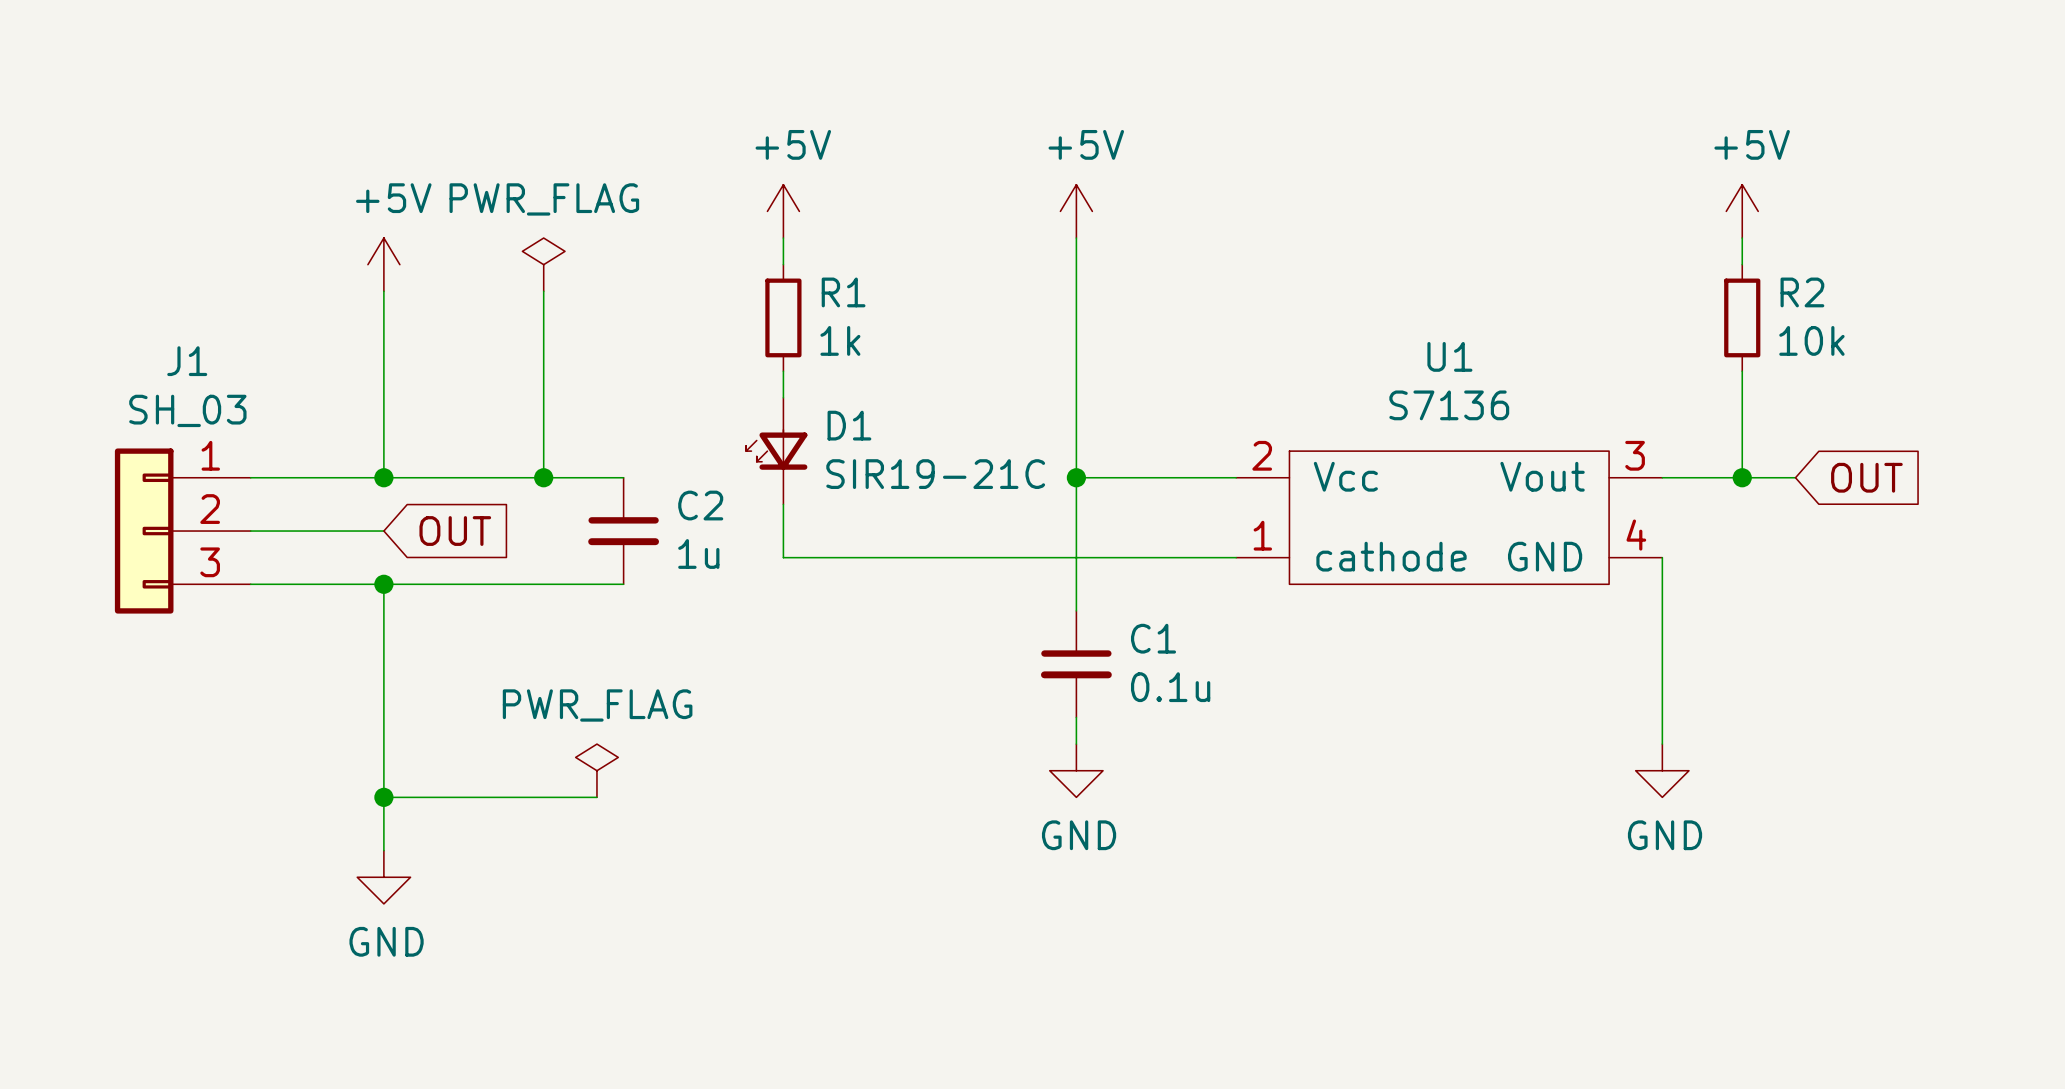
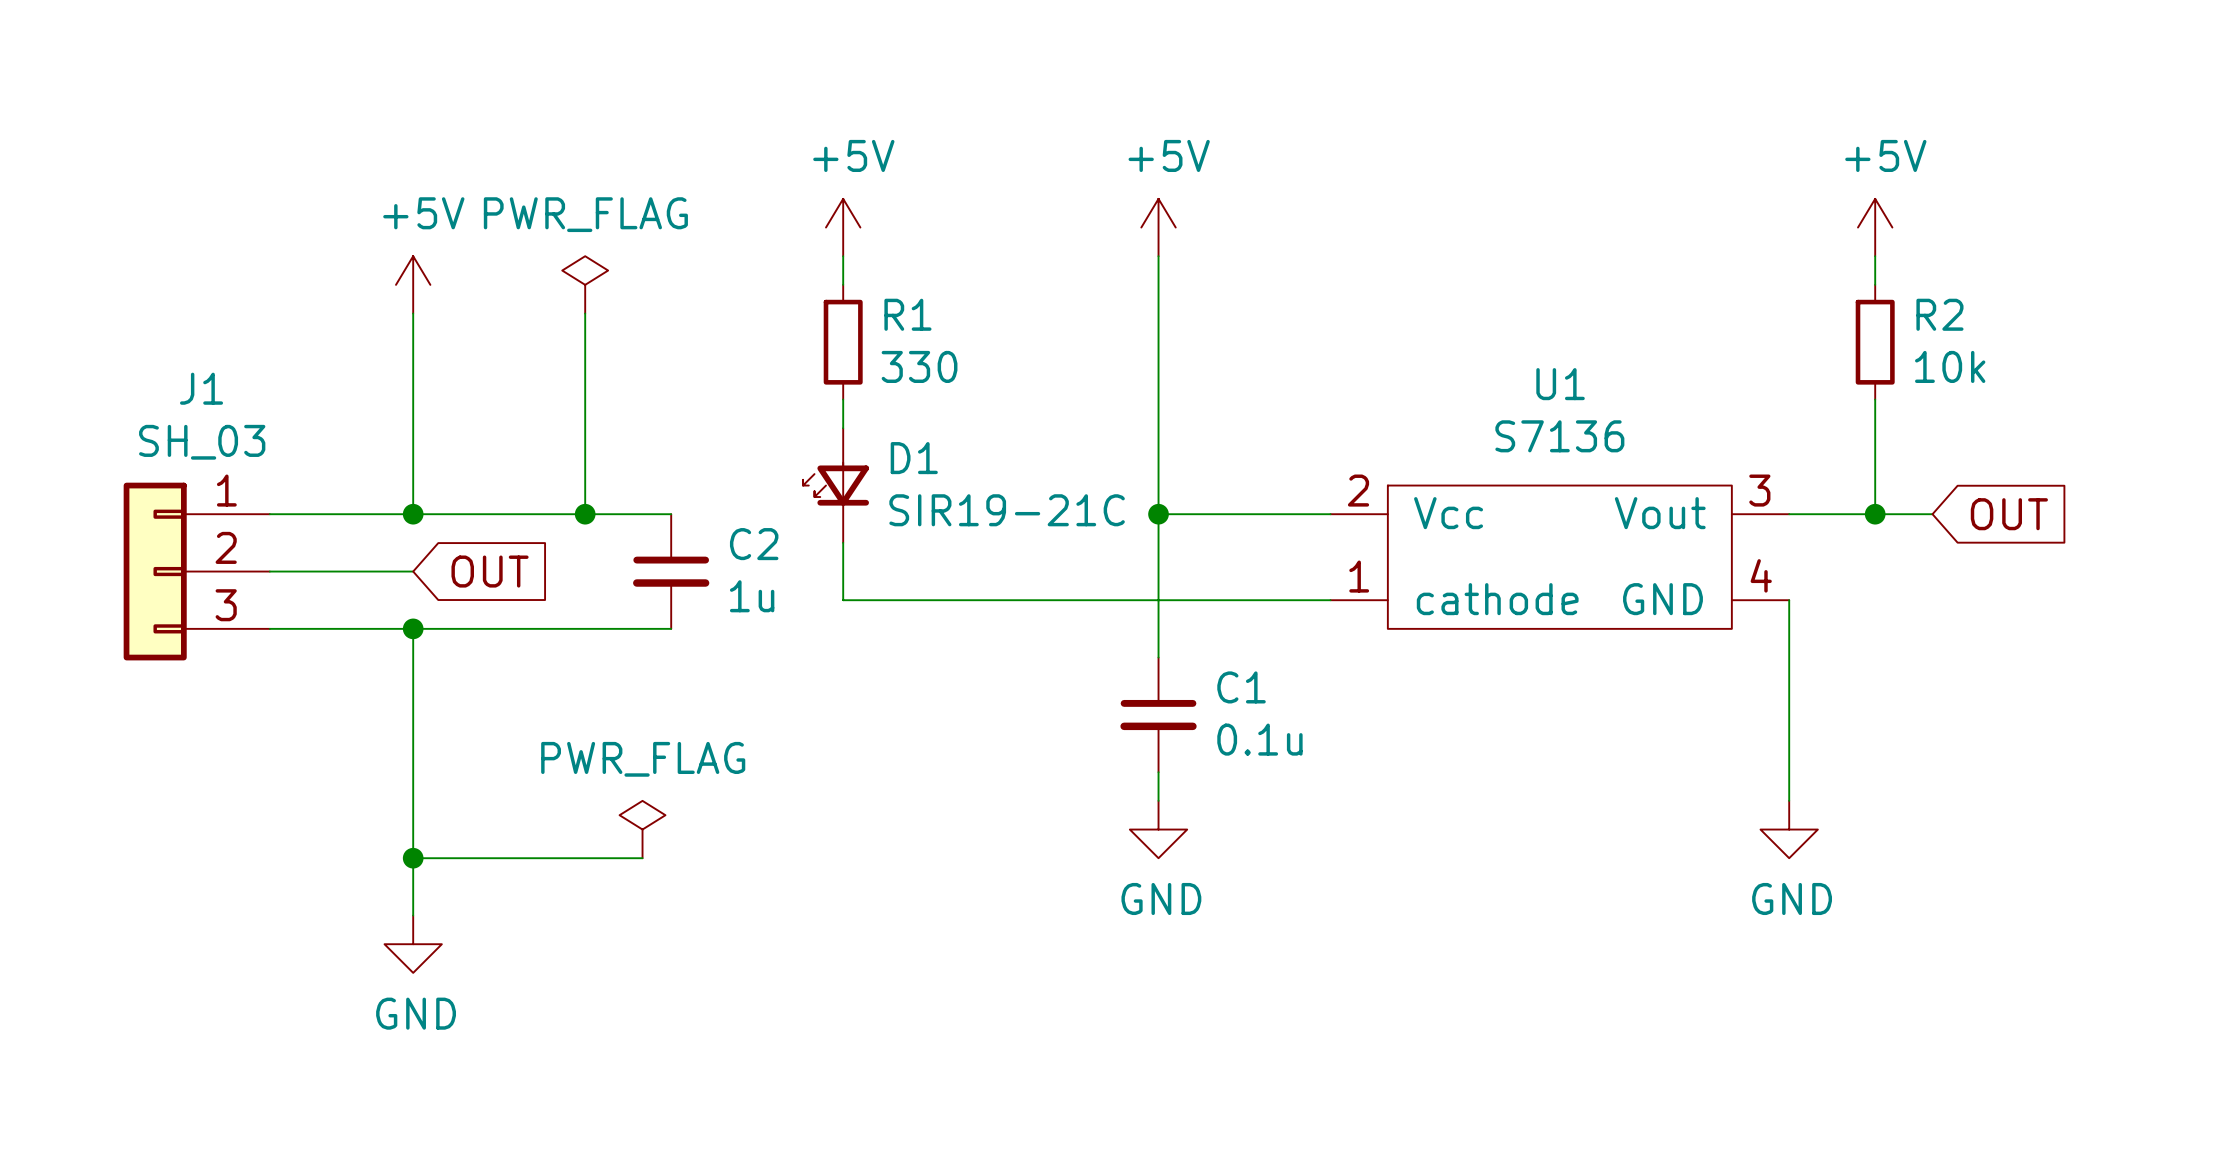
R1 value: 1k (840, 340) -> 330 (919, 366)

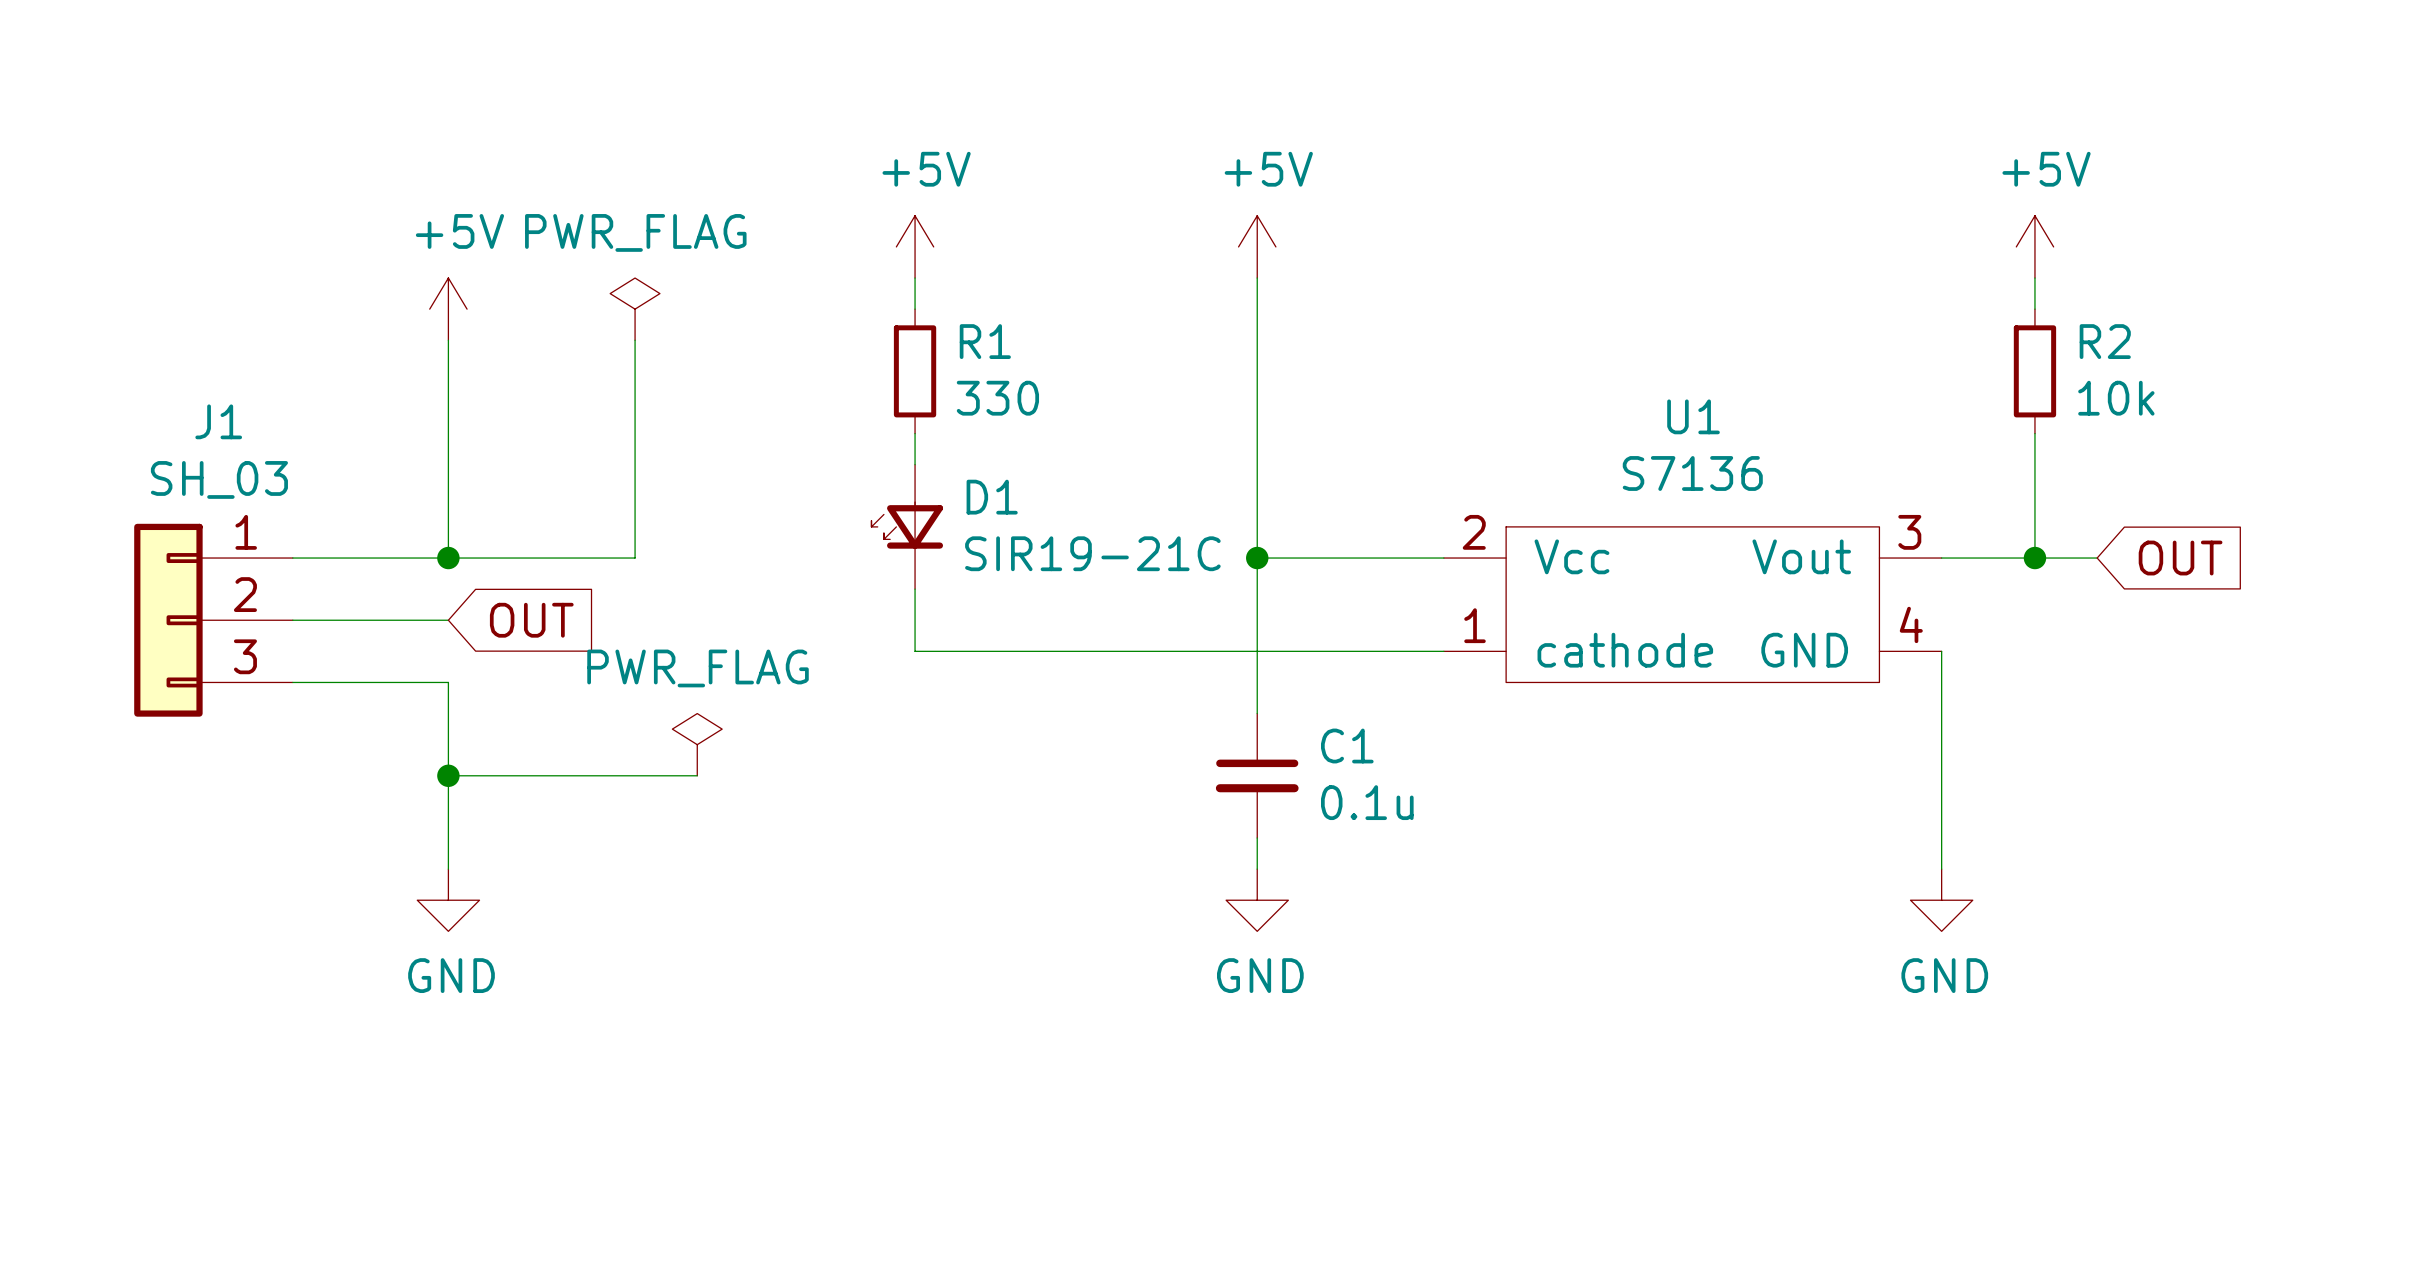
wire: (585, 514) (671, 514) -> none
junction: (585, 514) -> none
C2: 1u (671, 571) -> none
wire: (413, 628) (671, 628) -> none
junction: (413, 628) -> none
junction: none -> (448, 775)
wire: (413, 800) (413, 915) -> none
power symbol position: PWR_FLAG (642, 829) -> PWR_FLAG (697, 744)
wire: (413, 858) (642, 858) -> (448, 775) (697, 775)
junction: (413, 858) -> none
power symbol position: GND (413, 944) -> GND (448, 900)

